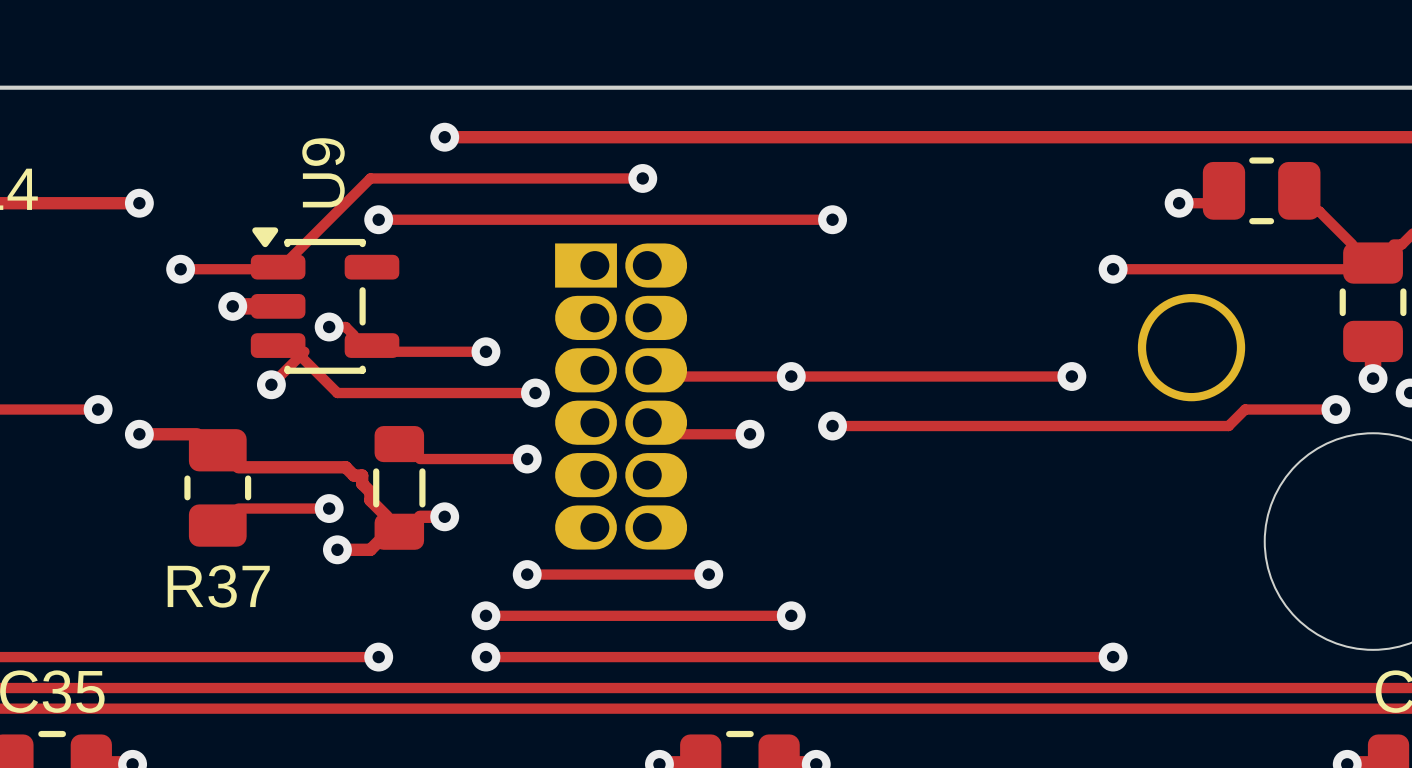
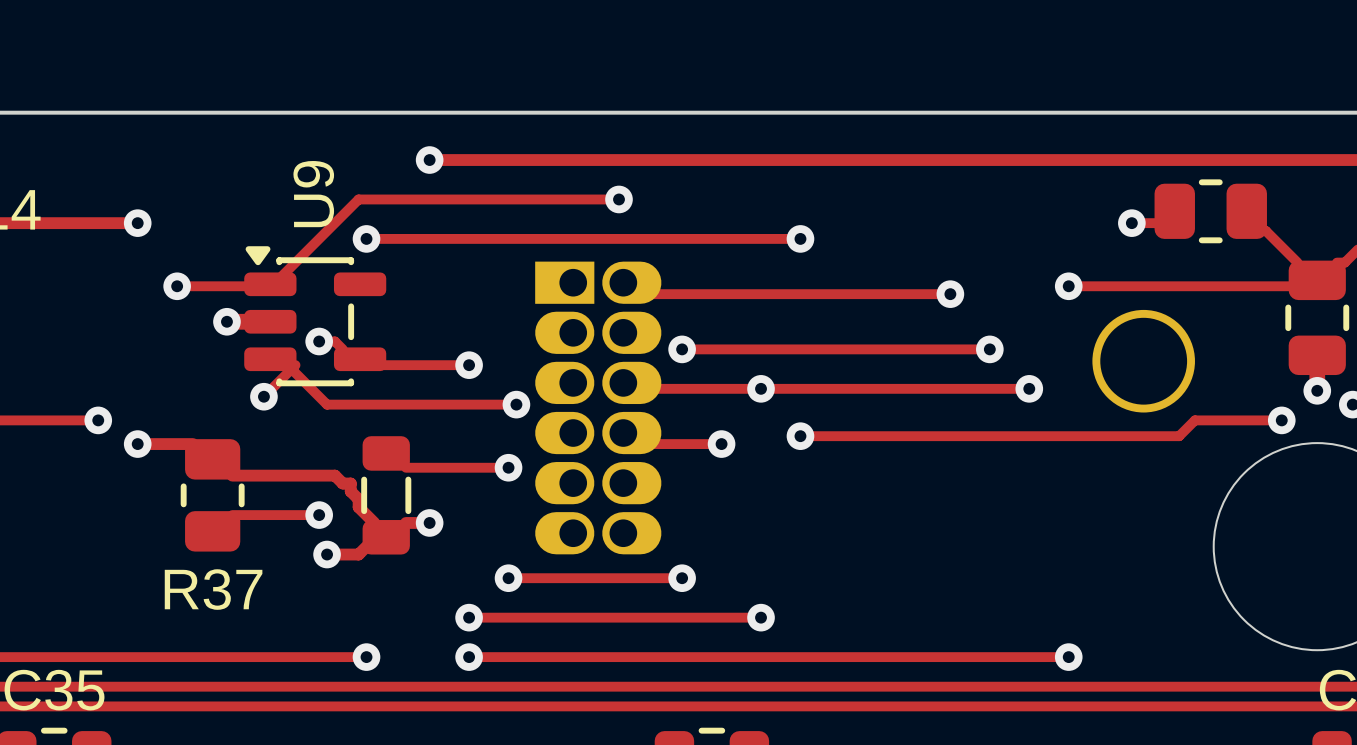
track: none -> (650, 294) (950, 294)
via: none -> (950, 294)
track: none -> (682, 349) (989, 349)
via: none -> (682, 349)
via: none -> (989, 349)

